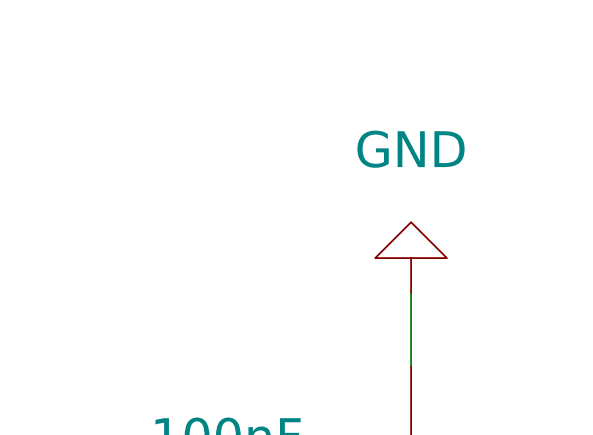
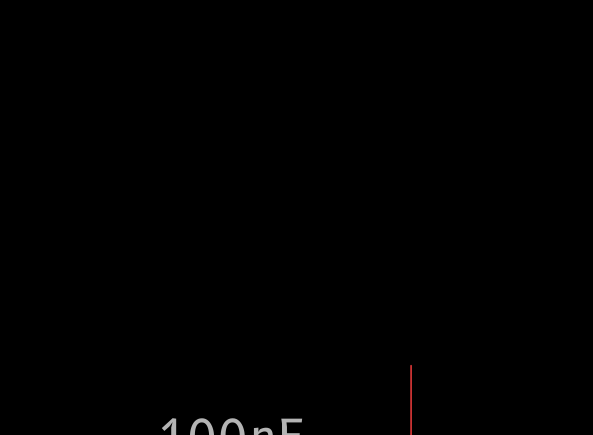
power symbol: GND (411, 258) -> none
wire: (411, 293) (411, 365) -> none

